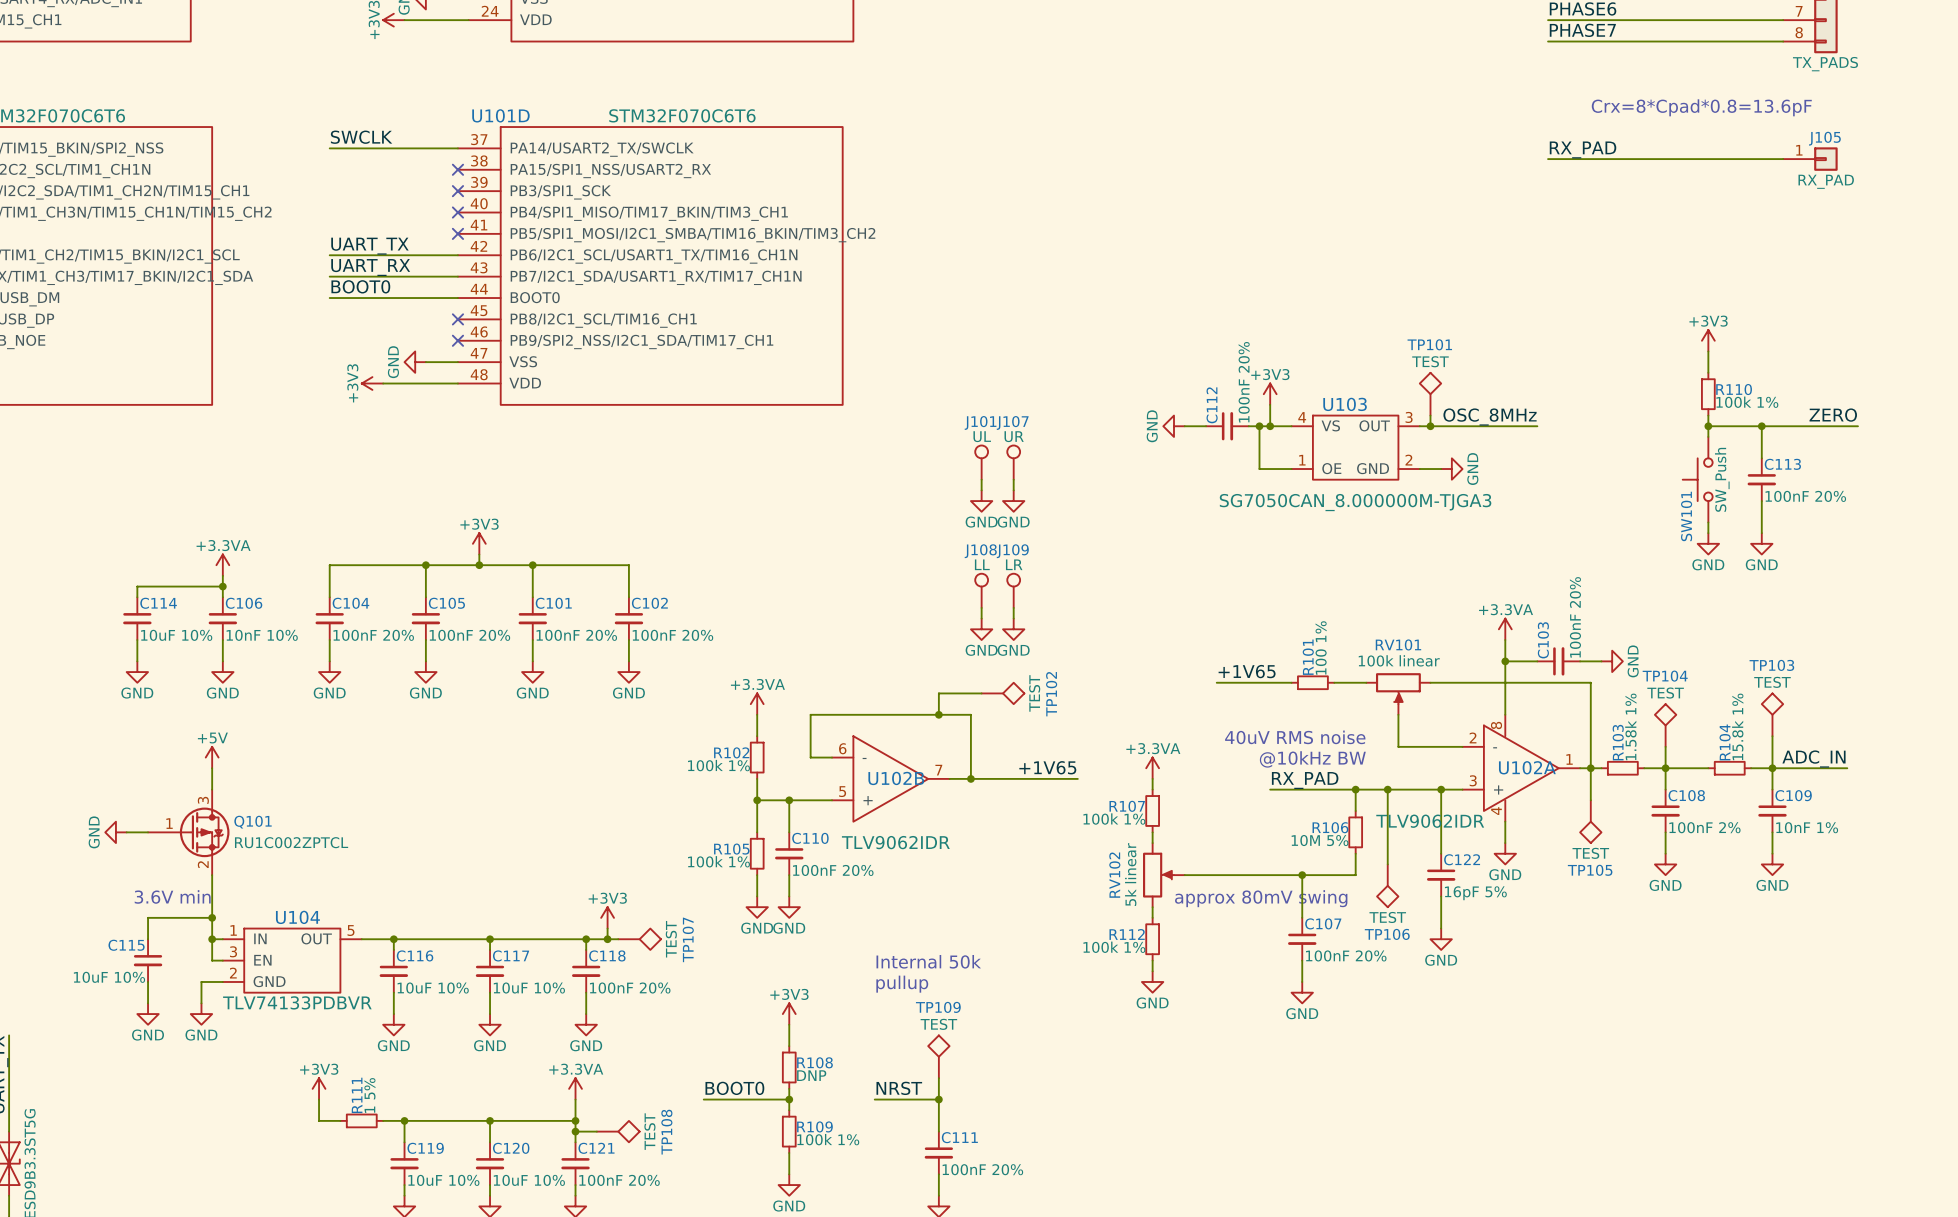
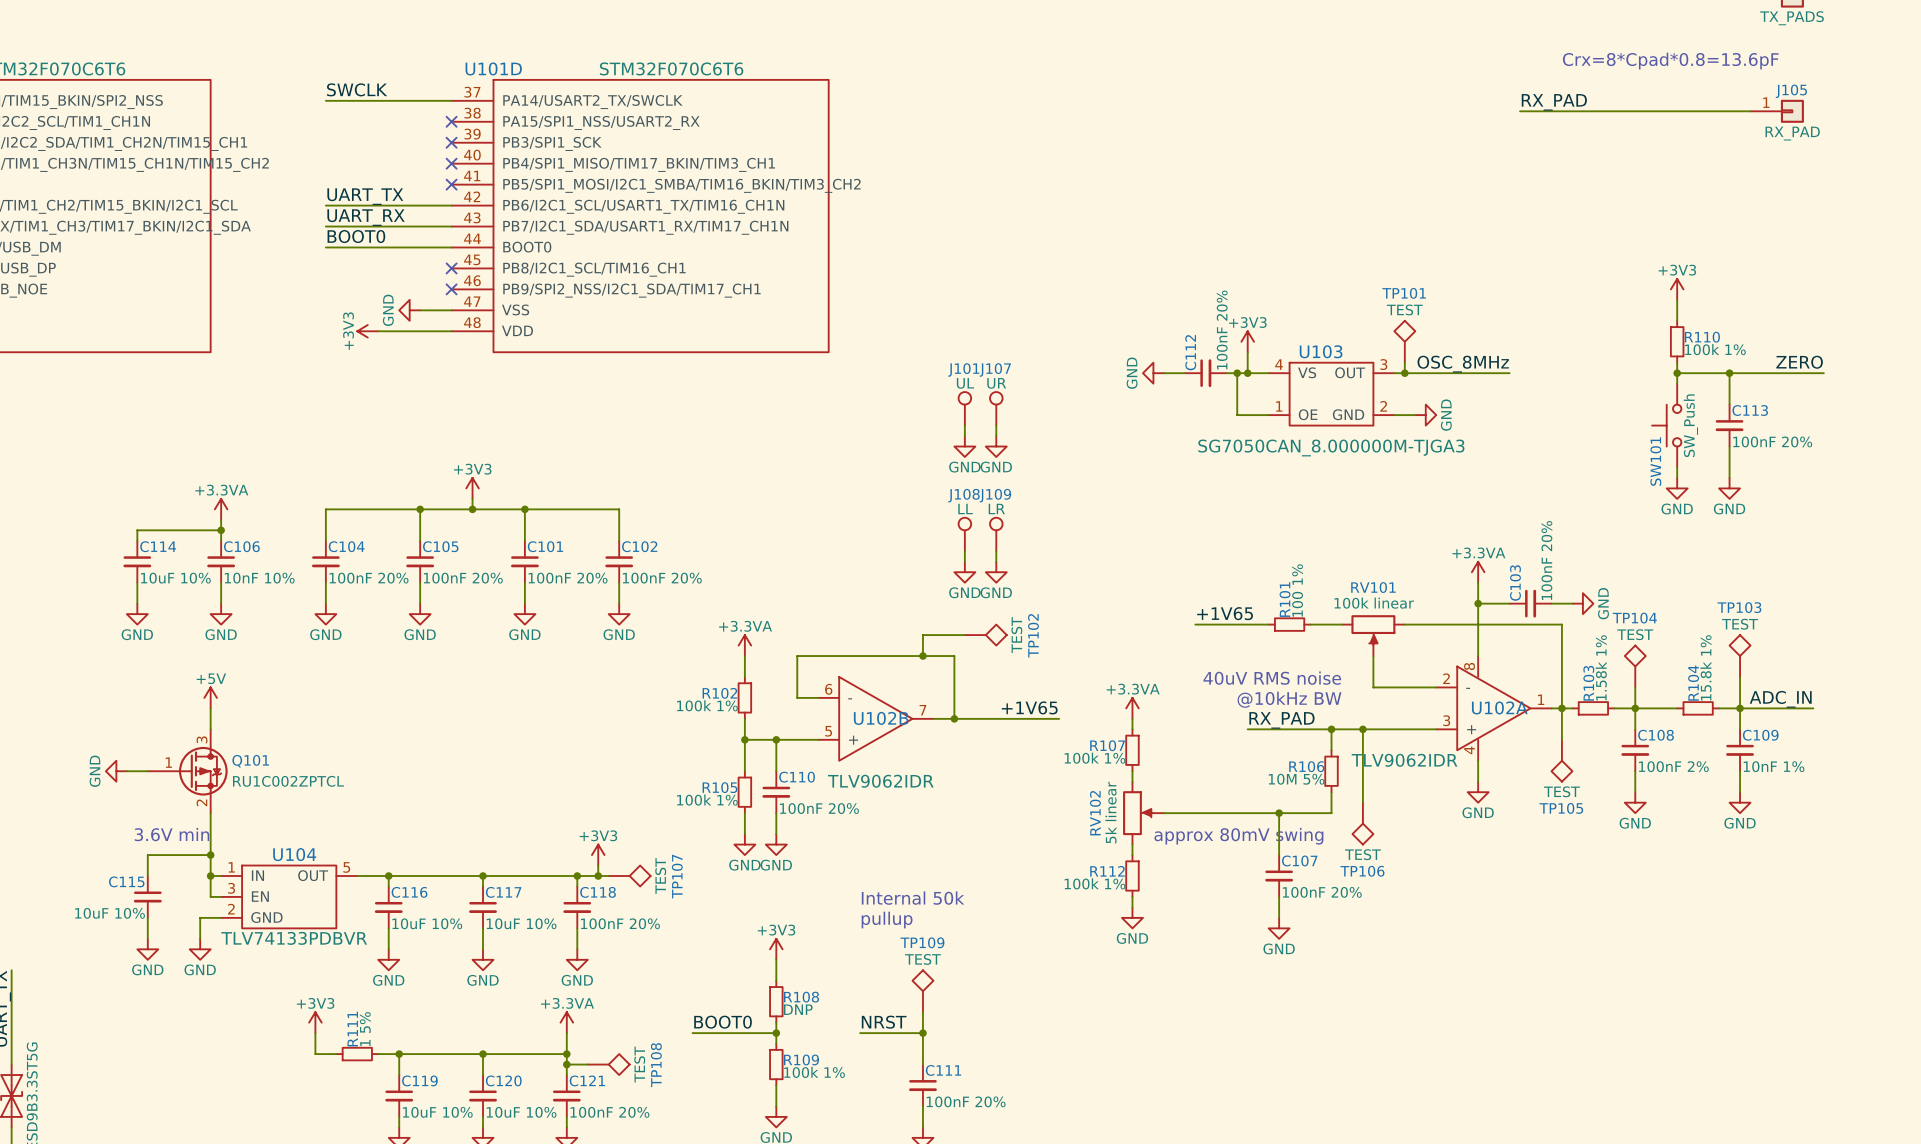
wire: (1441, 789) (1441, 853) -> none
junction: (1441, 789) -> none
C122: 16pF 5% (1441, 875) -> none
wire: (1441, 896) (1441, 928) -> none
power symbol: GND (1441, 939) -> none

